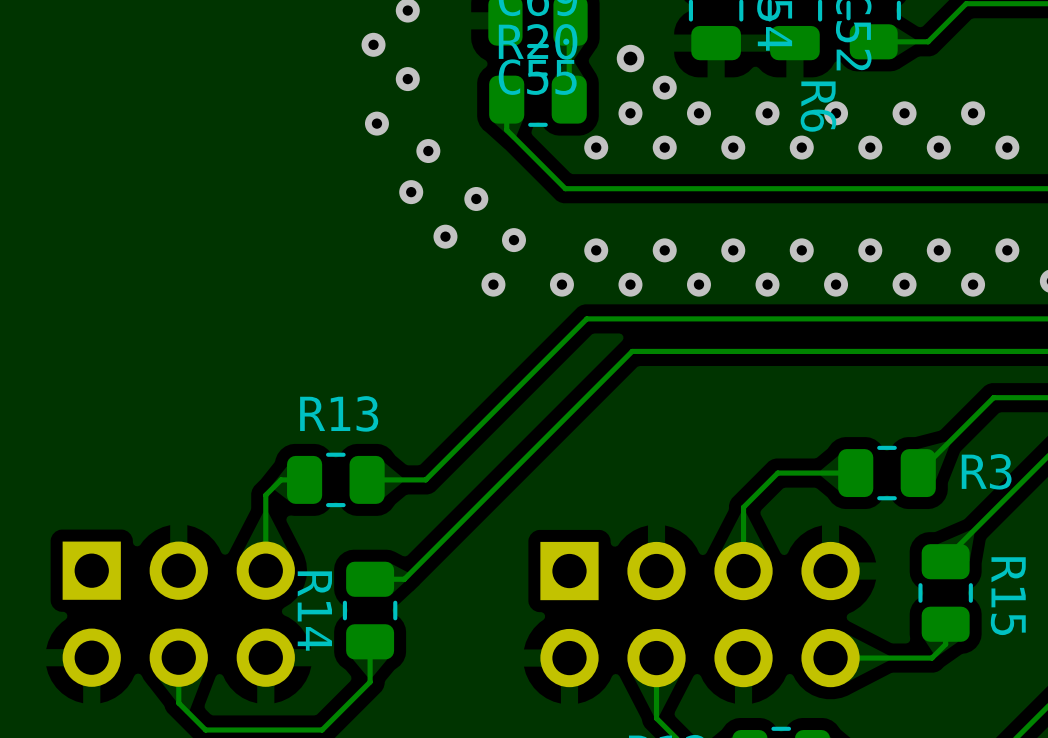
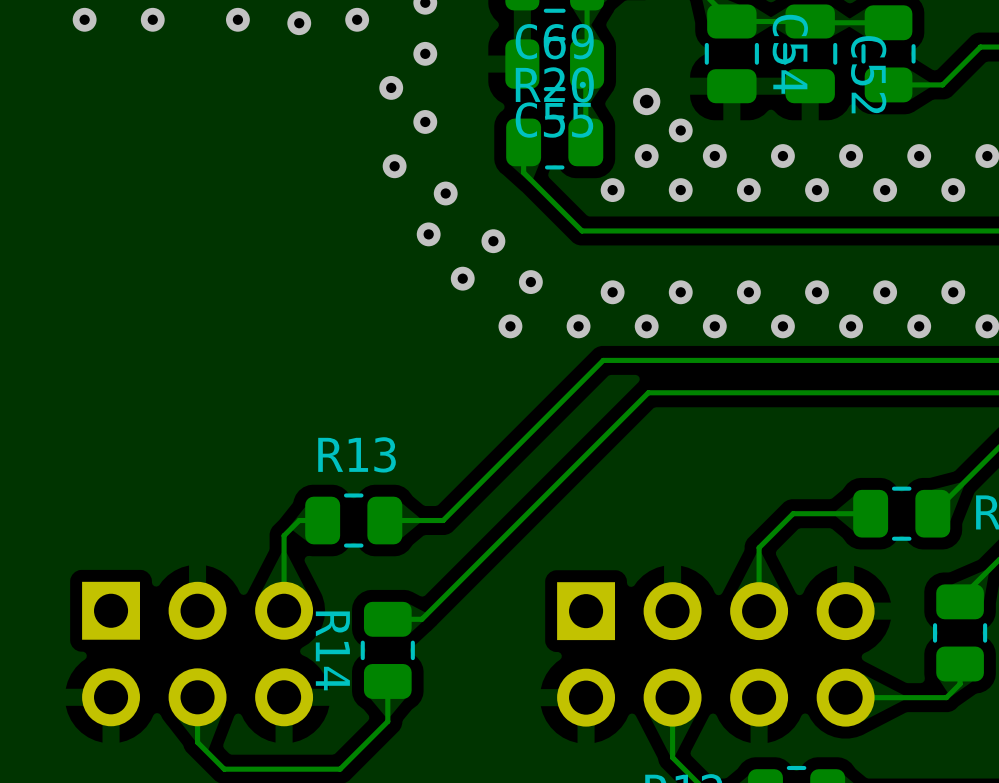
R6 name: R6 (818, 106) -> none

